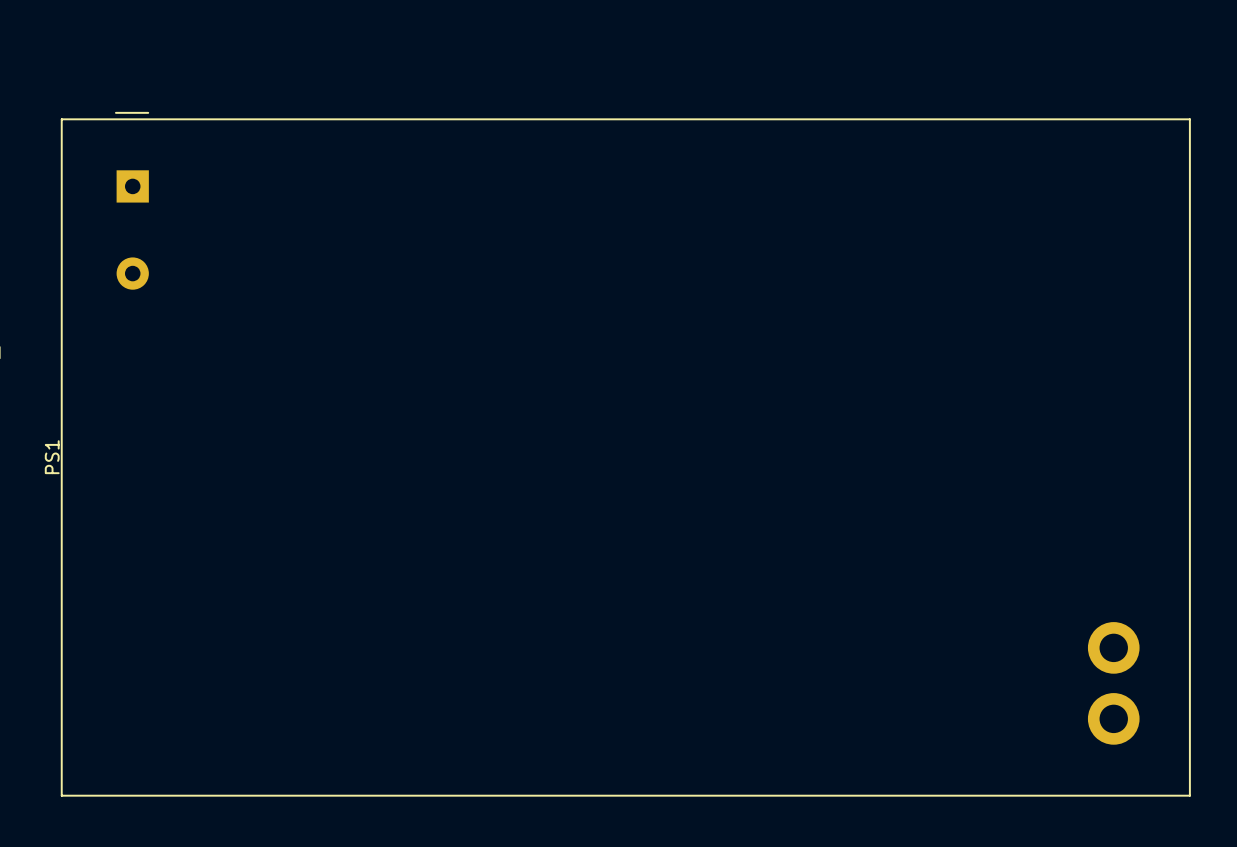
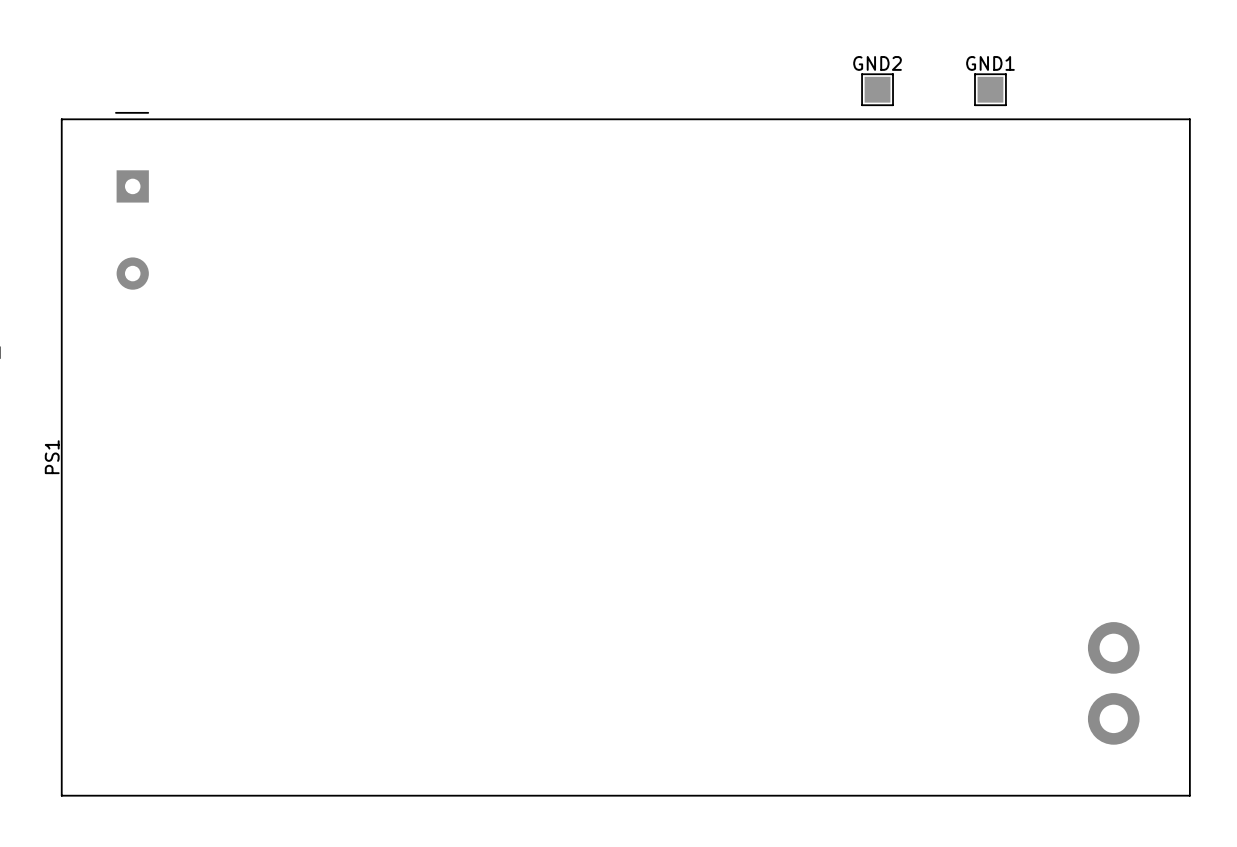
GND2: none -> (877, 89)
GND1: none -> (990, 89)

